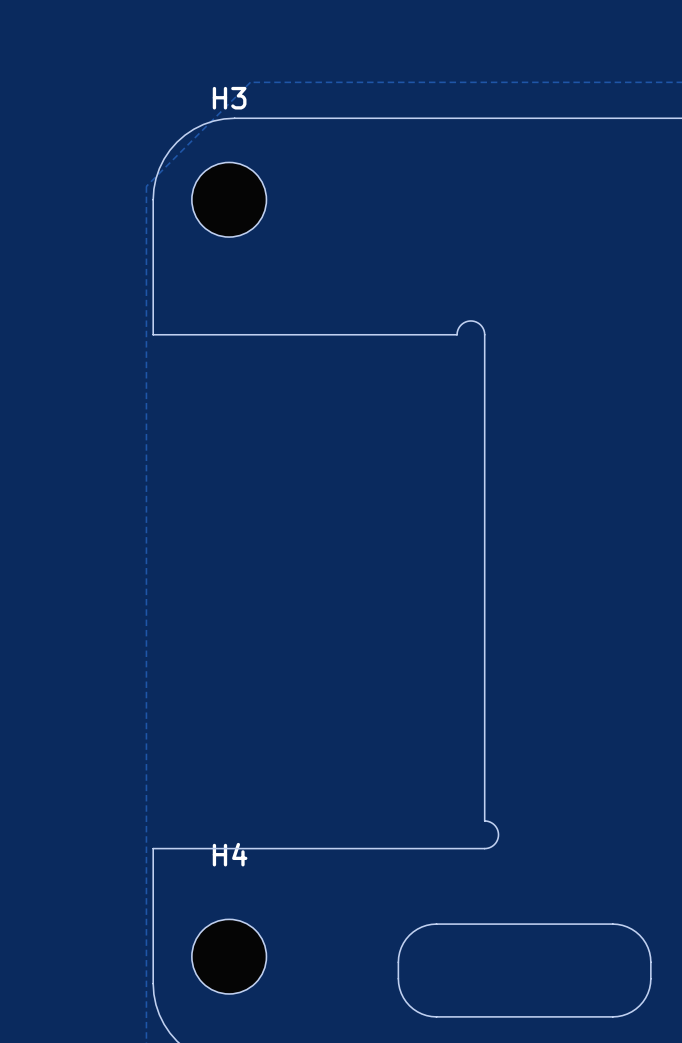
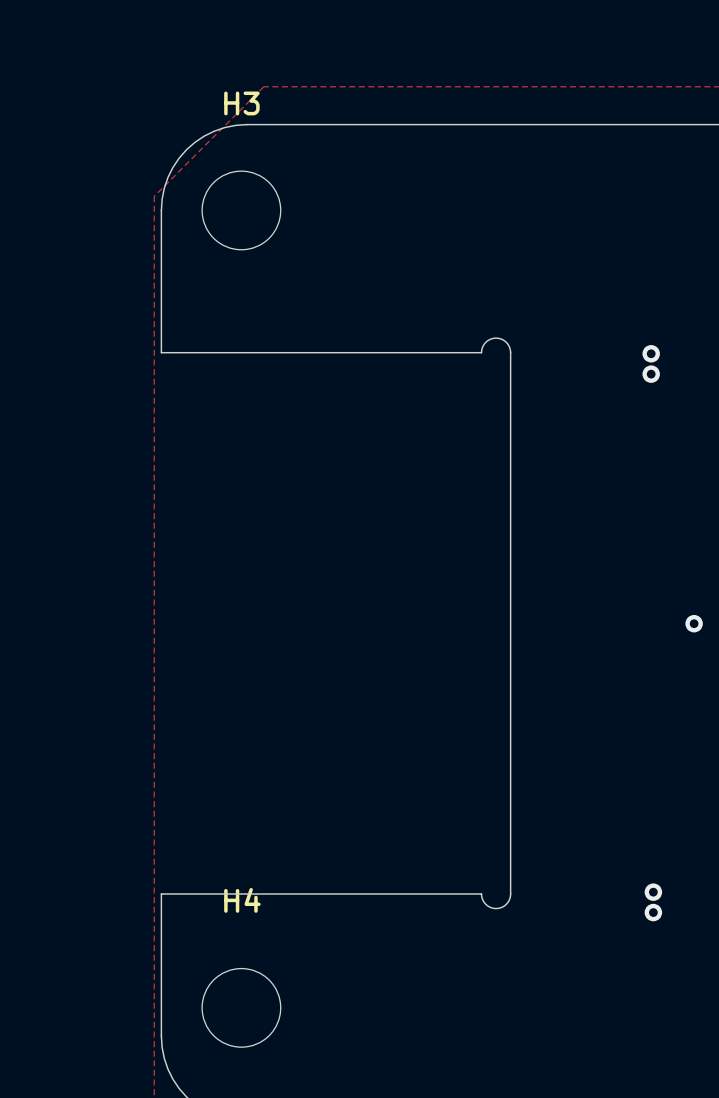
via: none -> (651, 353)
via: none -> (651, 374)
via: none -> (694, 623)
board edge: (484, 820) (493, 823) (497, 829) (498, 836) (494, 844) (486, 848) (457, 848) -> (510, 864) (510, 895) (506, 904) (497, 908) (490, 907) (484, 902) (481, 894)
via: none -> (653, 892)
via: none -> (653, 912)
board edge: (436, 924) (622, 925) (635, 931) (647, 947) (650, 962) (649, 988) (639, 1005) (627, 1014) (617, 1016) (426, 1015) (409, 1005) (401, 993) (398, 983) (398, 957) (403, 943) (413, 931) (426, 925) (436, 924) -> none

